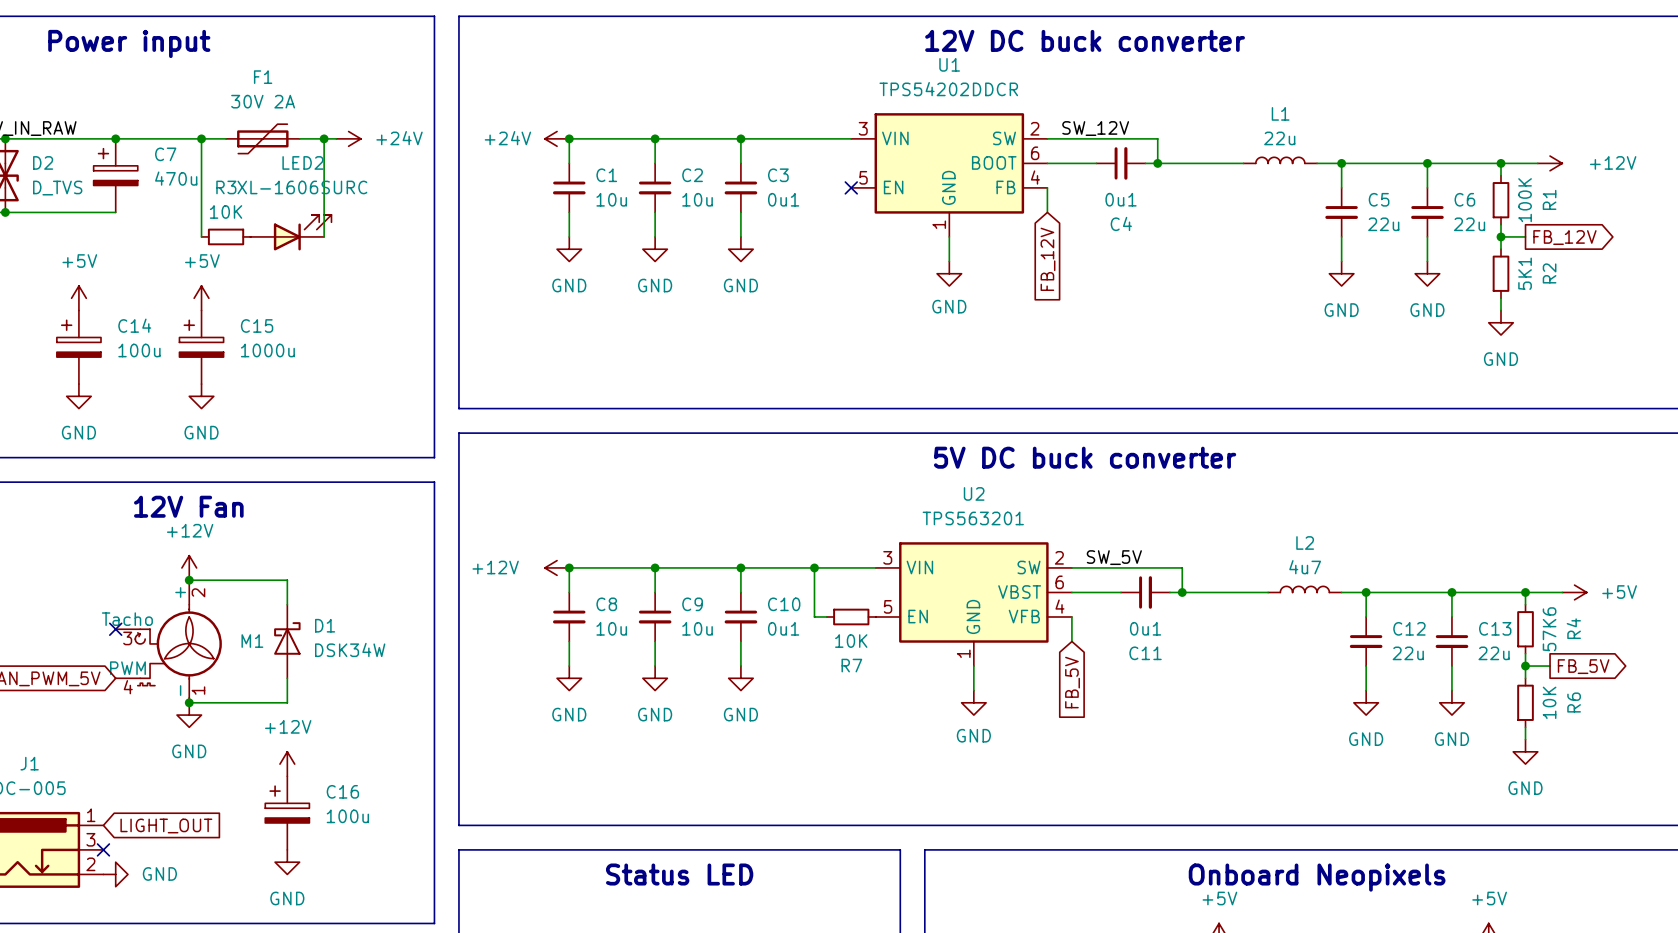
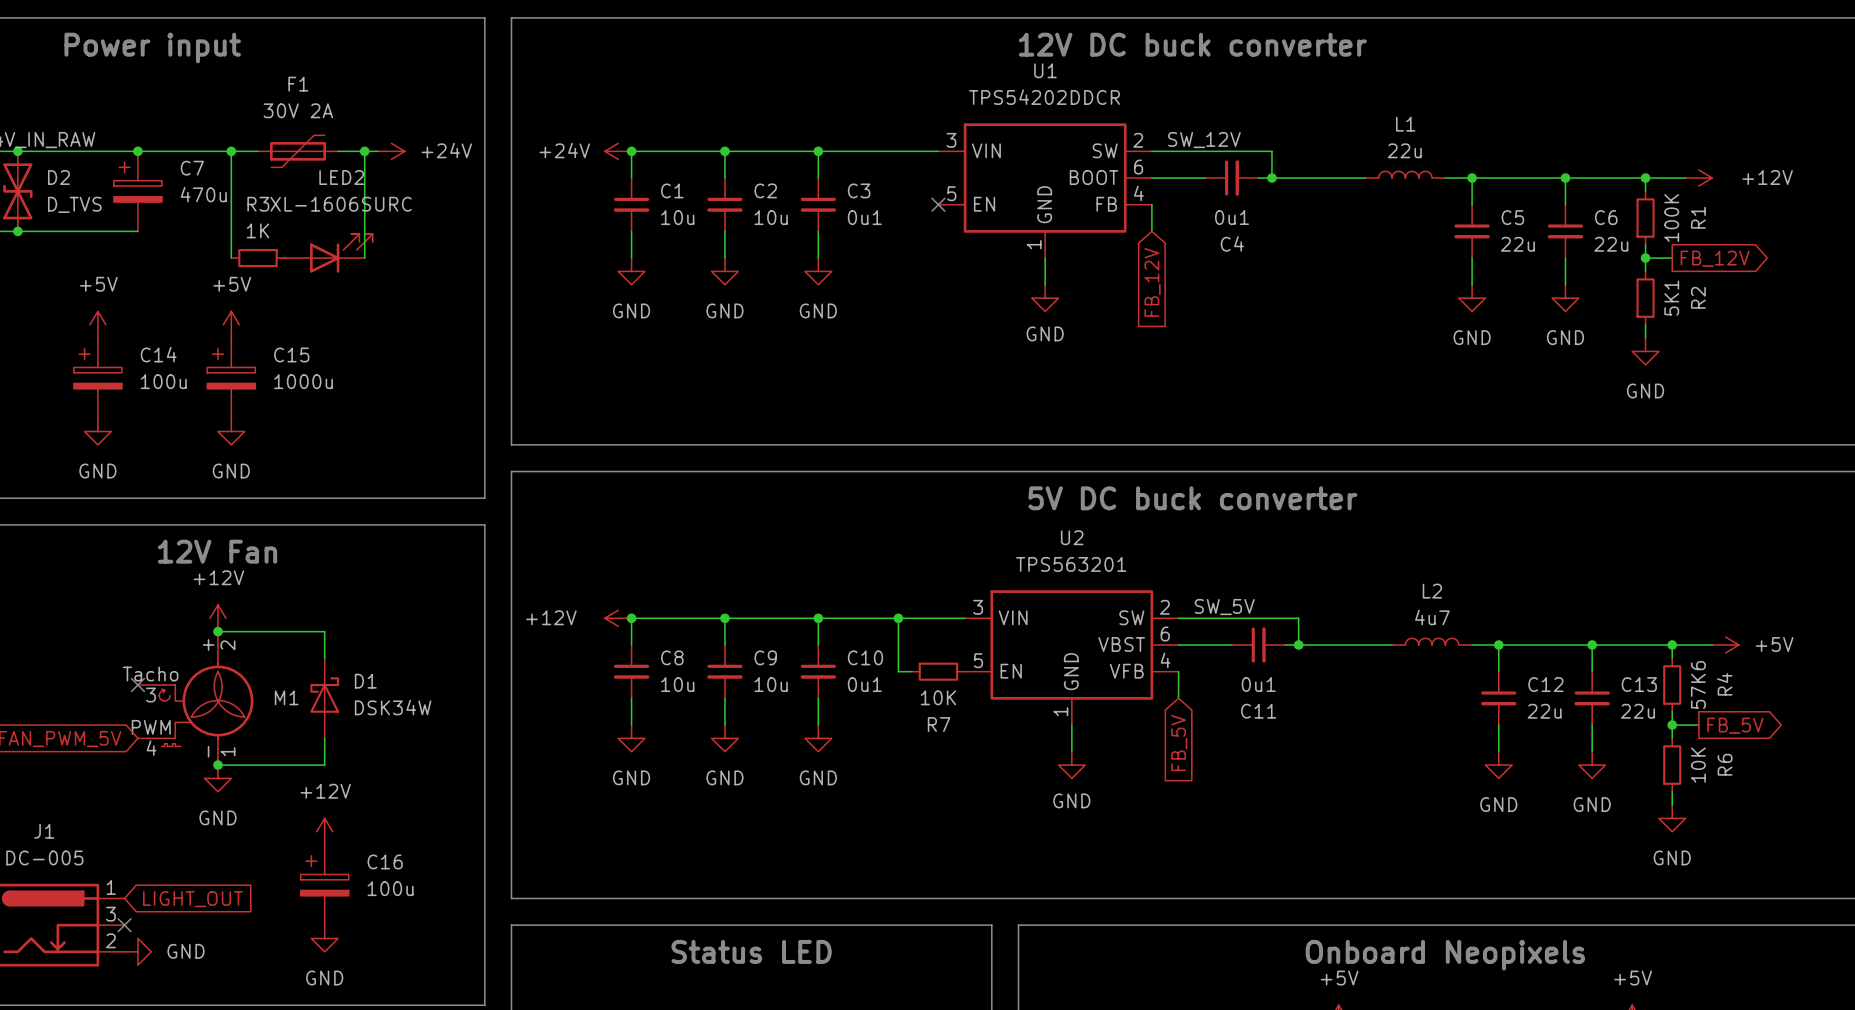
R3 value: 10K (226, 211) -> 1K (258, 230)

